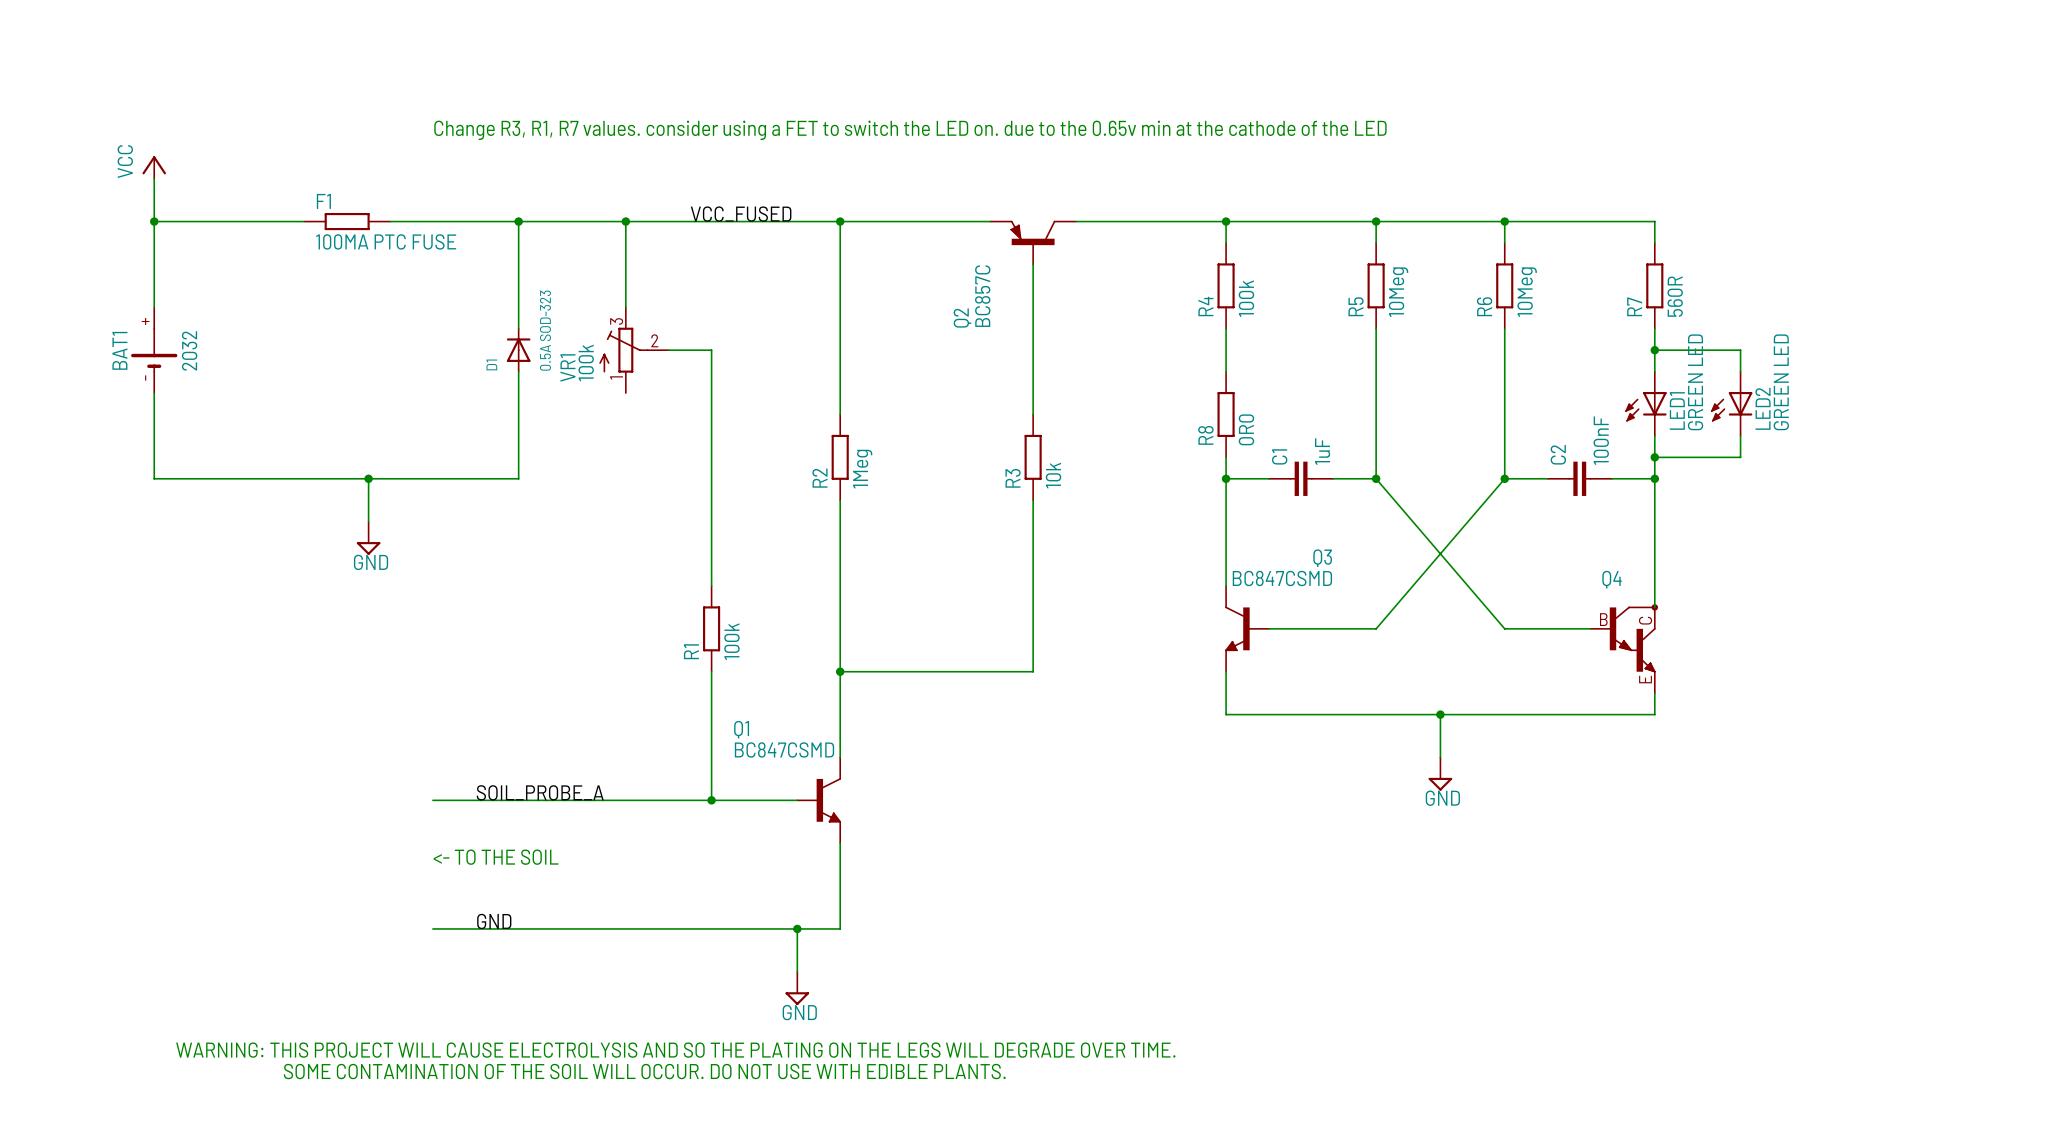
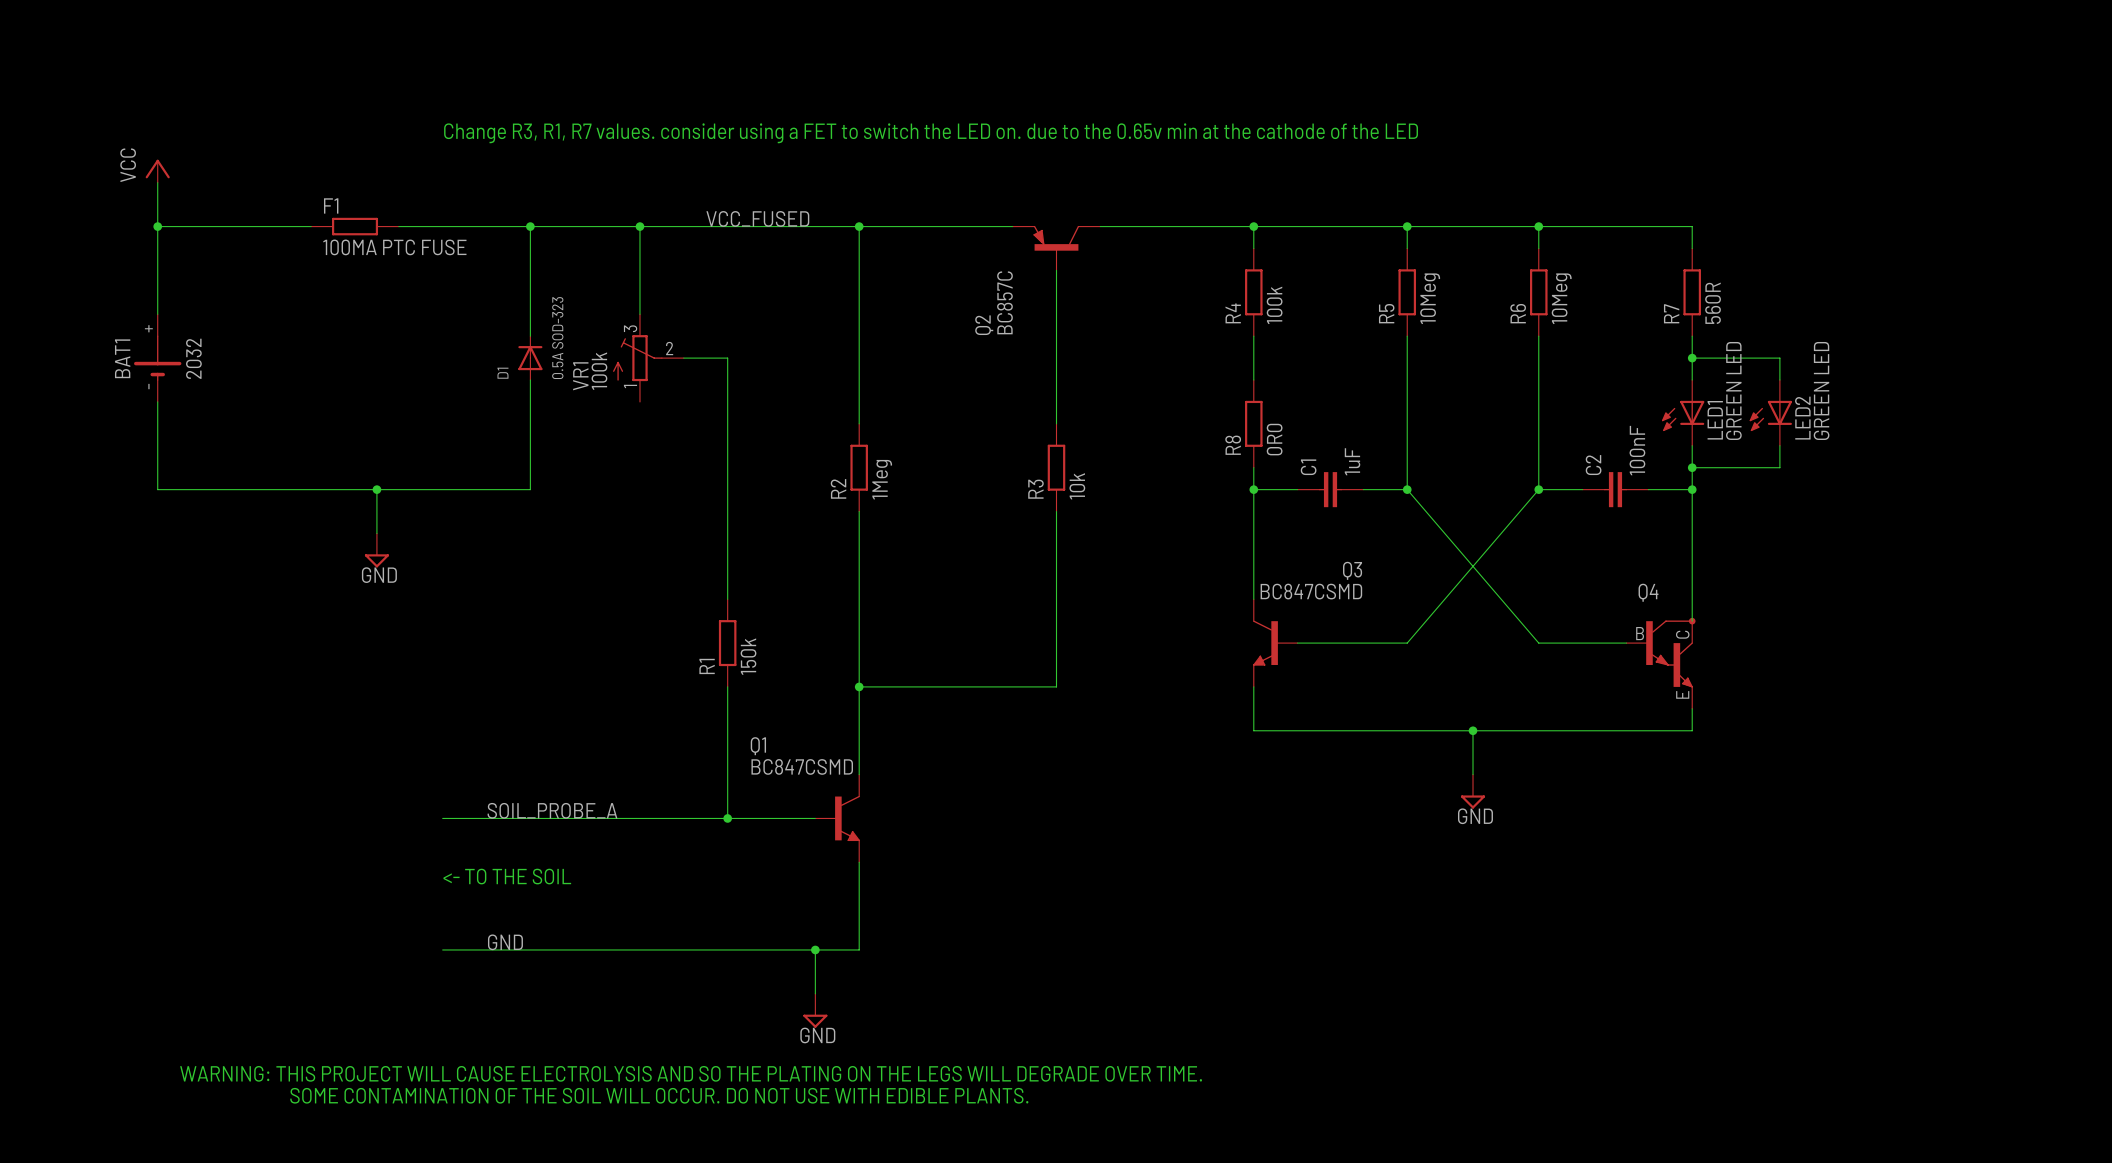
R1 value: 100k (731, 641) -> 150k (748, 656)

